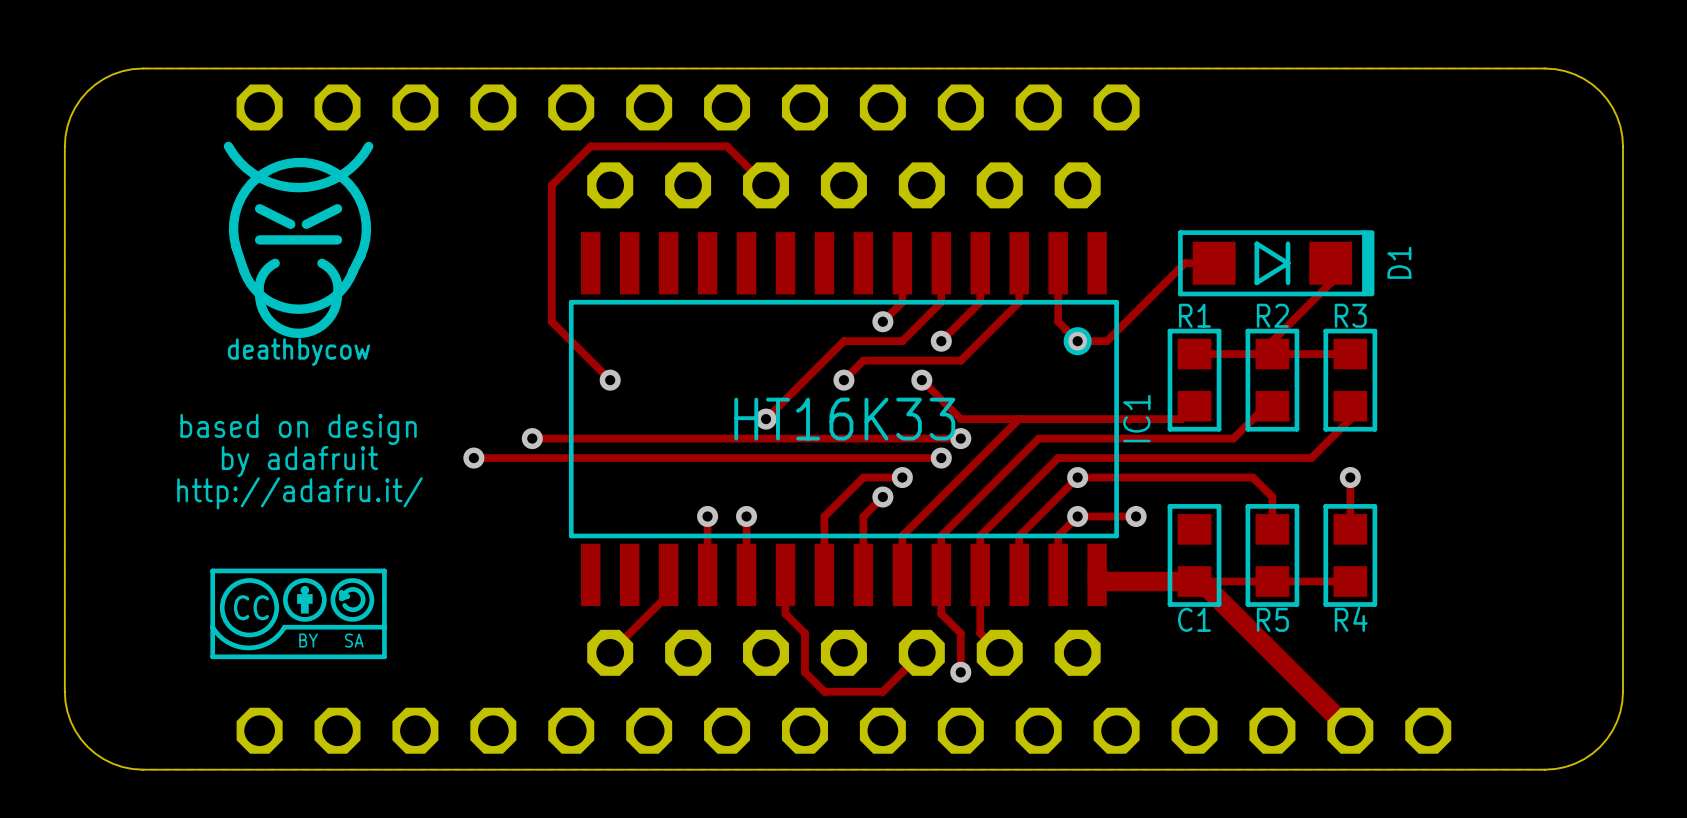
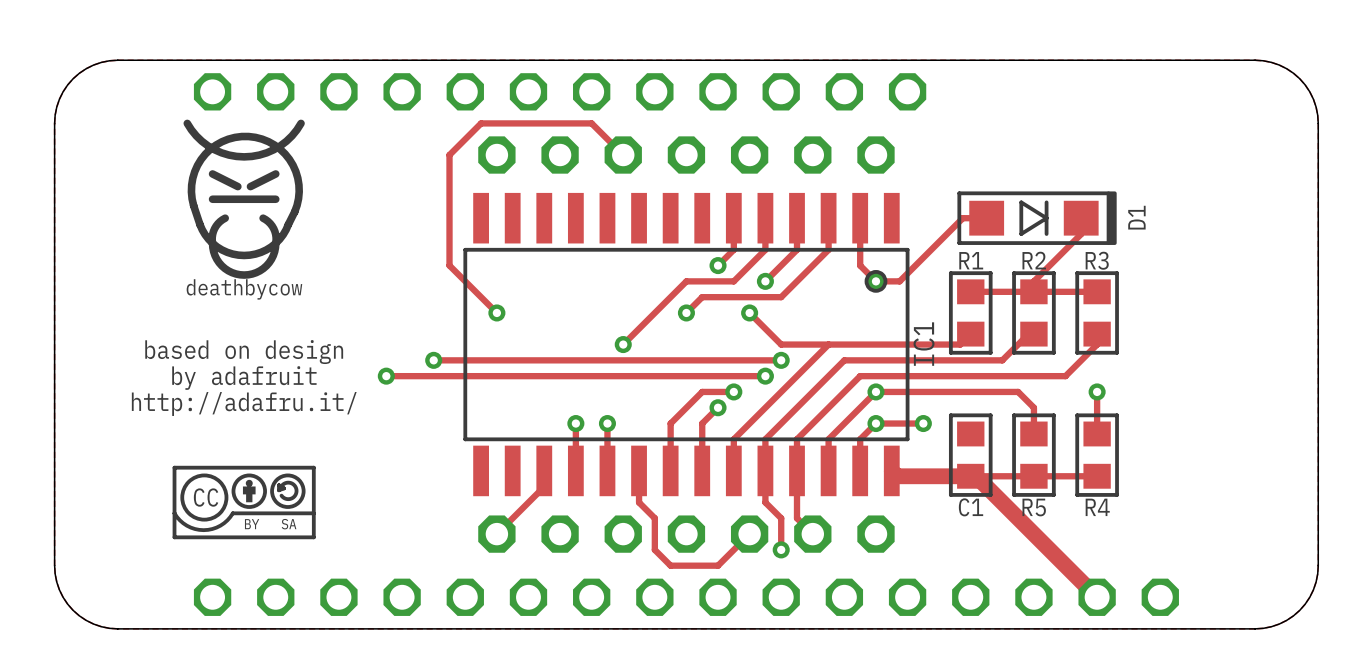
IC1 value: HT16K33 (844, 419) -> none

